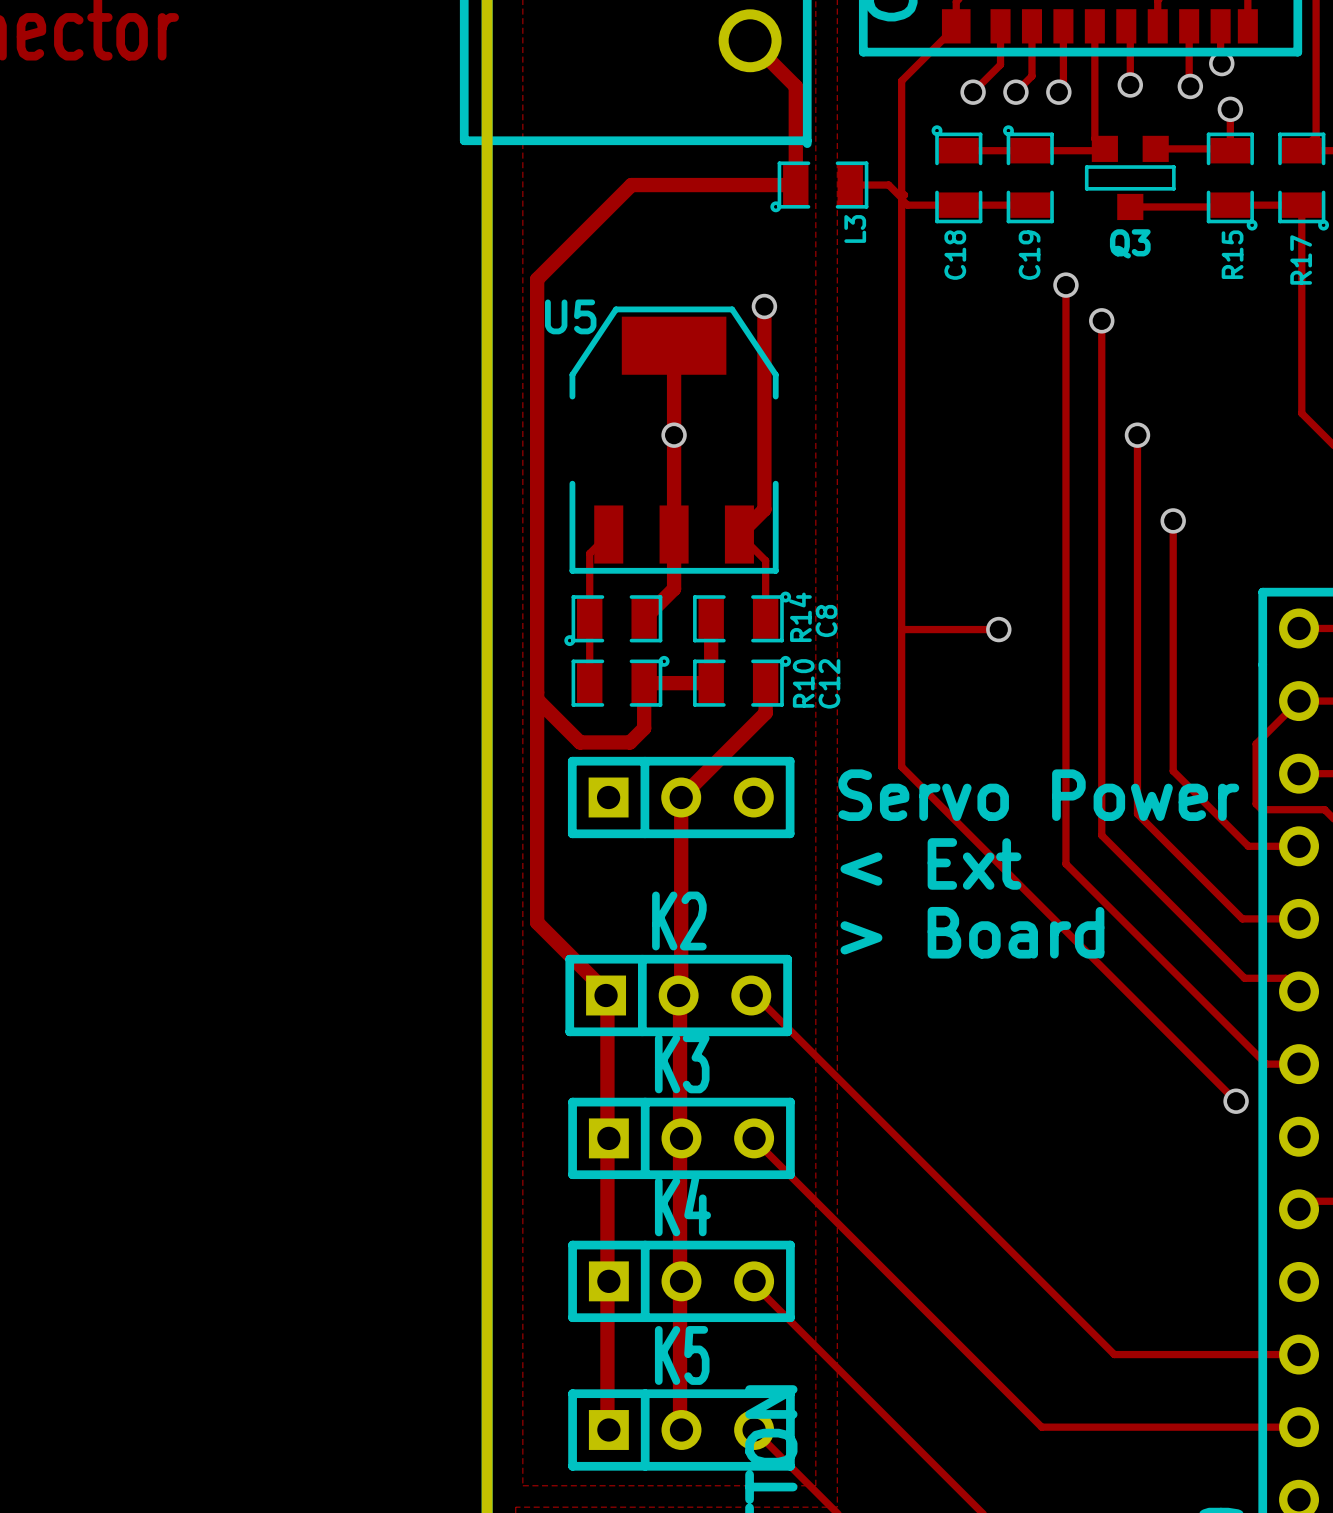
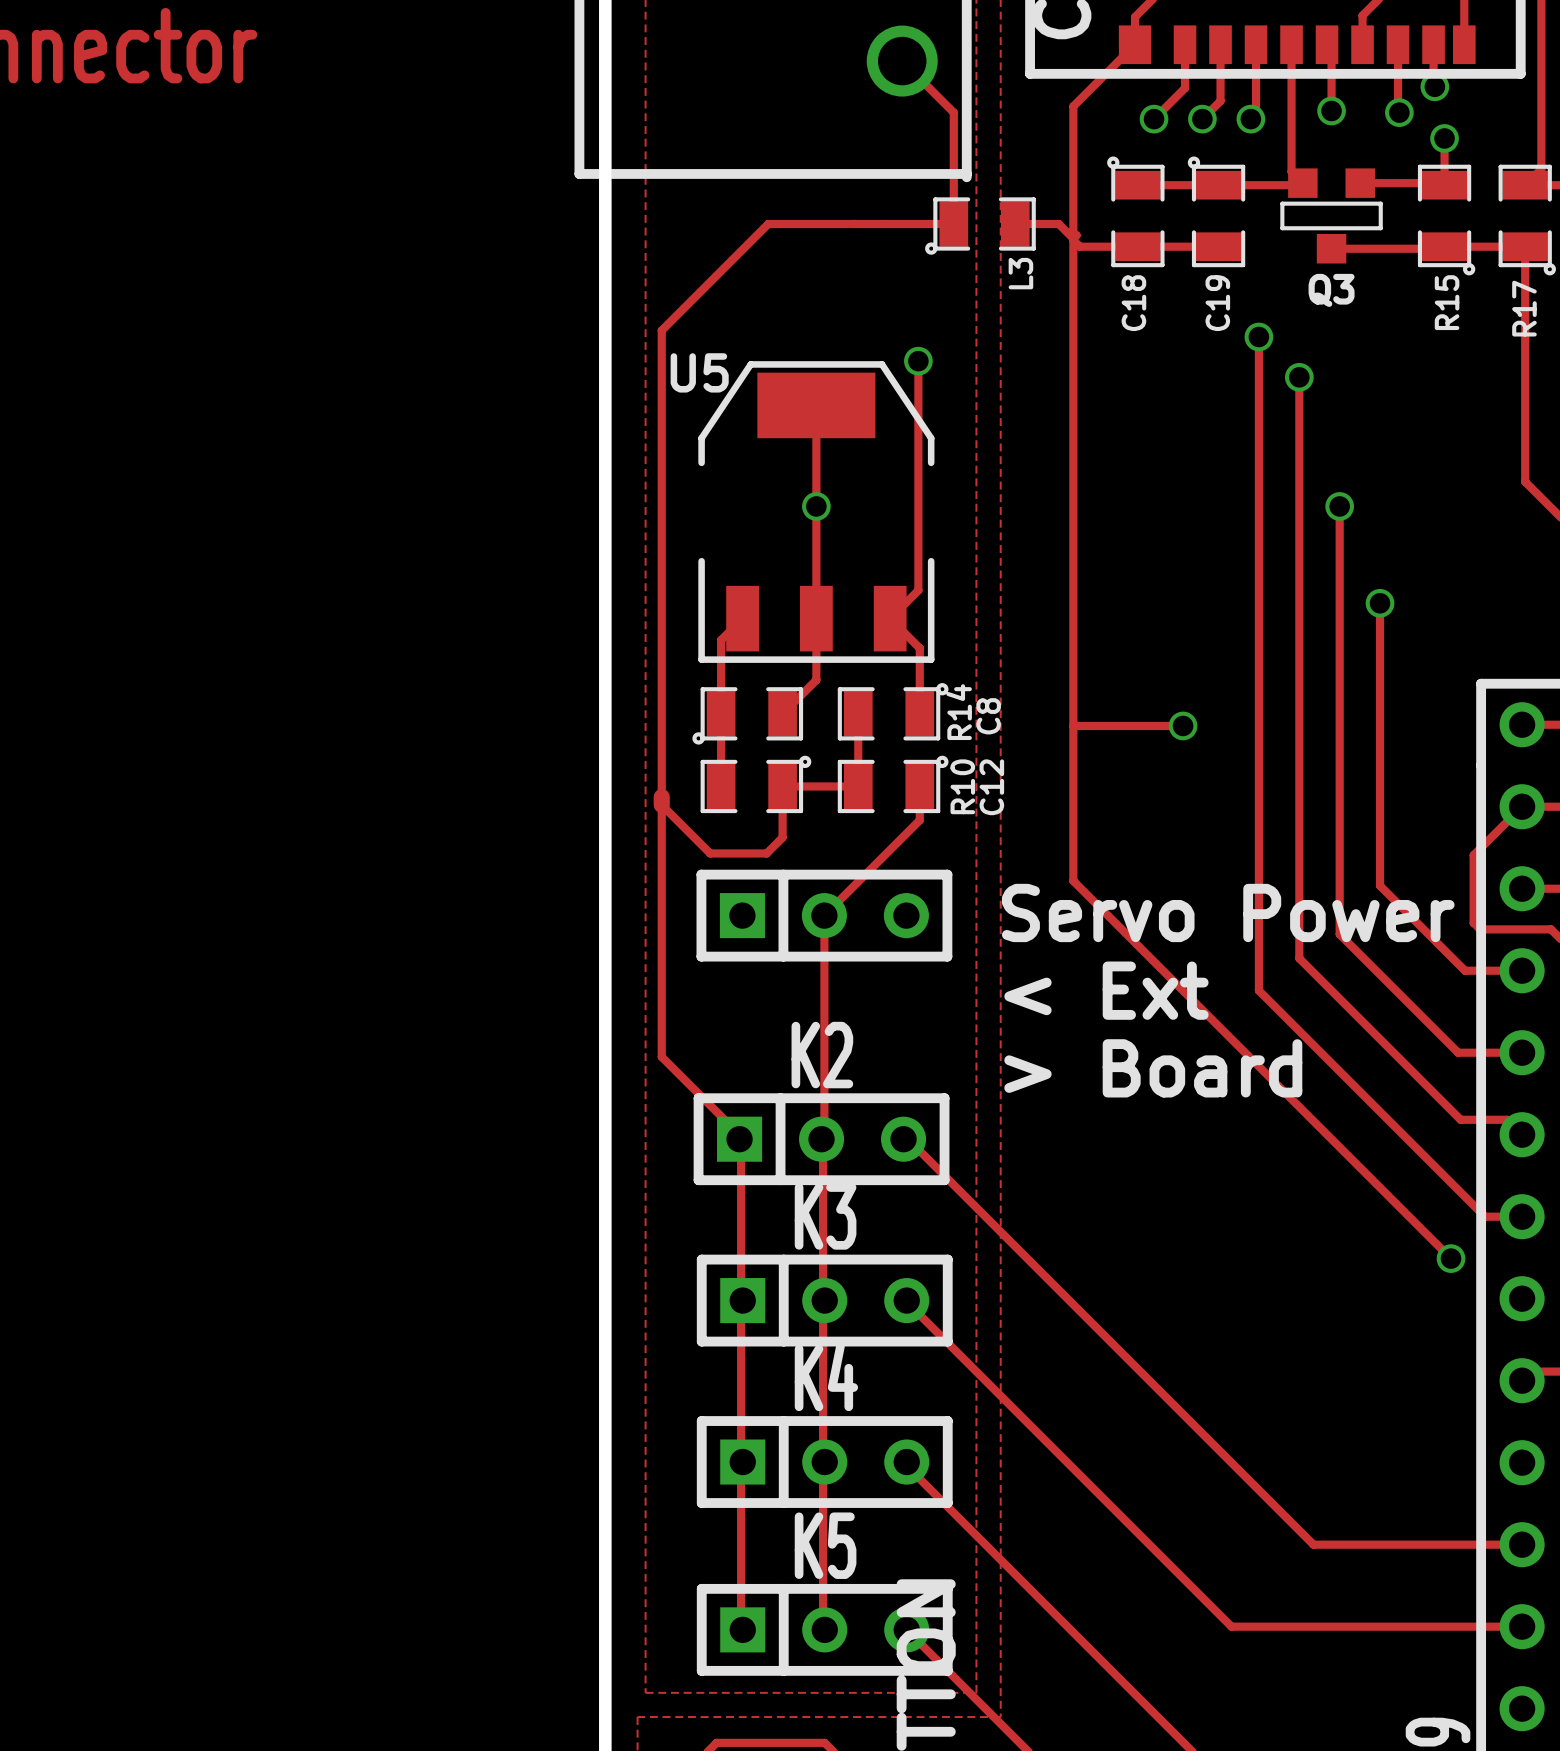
track width: thick (750, 40) (795, 86) (795, 185) (631, 185) (537, 279) (537, 692) -> thin (902, 61) (953, 112) (953, 223) (768, 223) (661, 330) (661, 796)
track width: thick (764, 306) (764, 509) (739, 534) -> thin (918, 361) (918, 590) (890, 618)
track width: thick (674, 345) (674, 588) (644, 618) -> thin (816, 405) (816, 680) (782, 713)
track width: thick (711, 618) (711, 683) (644, 683) (644, 728) (630, 742) (580, 742) (537, 699) (537, 922) (607, 992) (607, 1428) -> thin (858, 713) (858, 786) (782, 786) (782, 837) (766, 853) (710, 853) (661, 805) (661, 1056) (741, 1136) (741, 1628)
track width: thick (765, 683) (765, 713) (681, 797) (681, 991) -> thin (919, 786) (919, 820) (824, 915) (824, 1134)
track width: thick (680, 992) (680, 1428) -> thin (823, 1136) (823, 1628)

